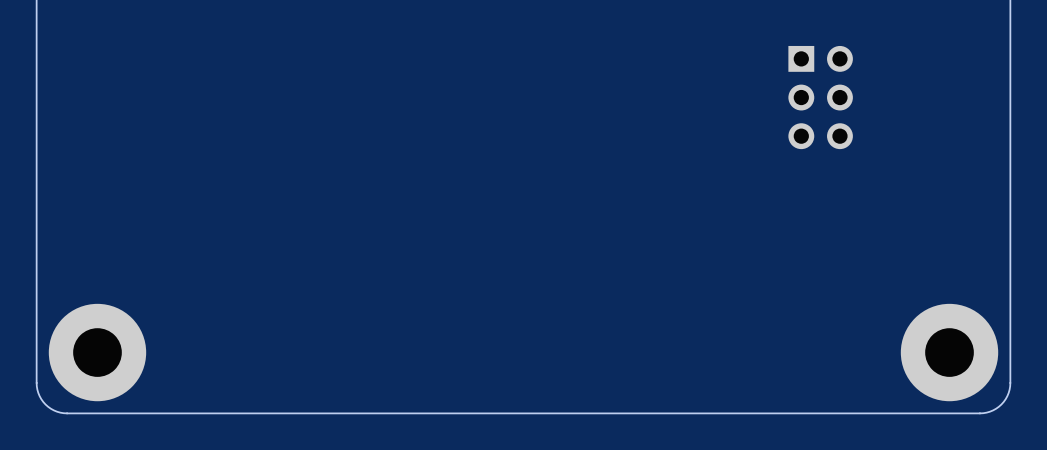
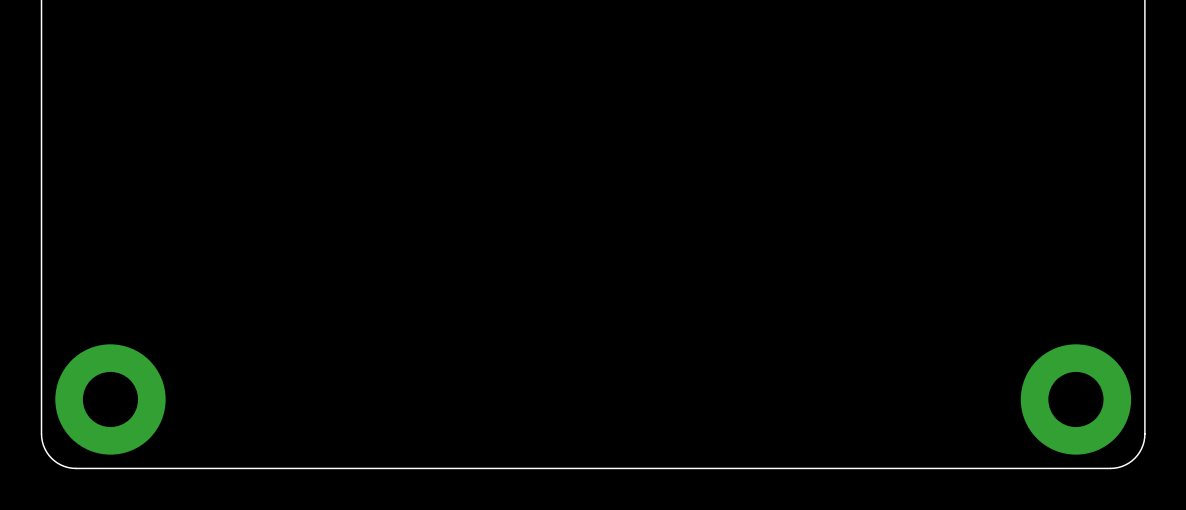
part: (820, 97) -> none

